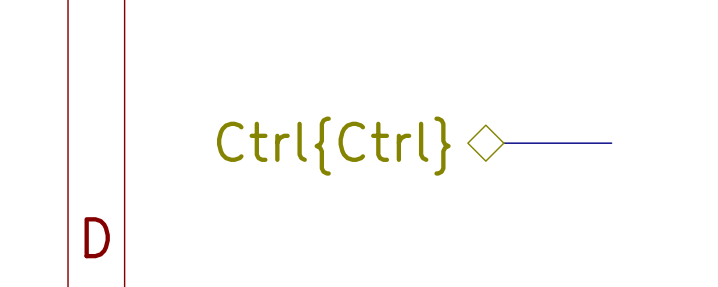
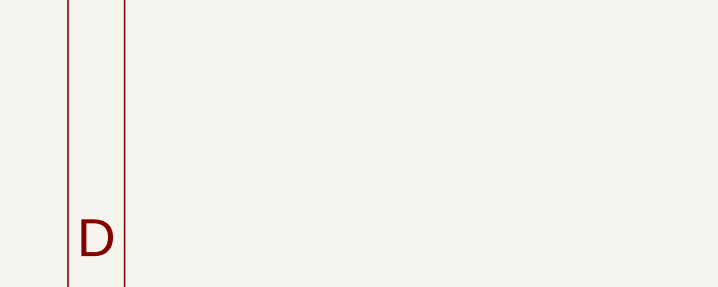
bus: (503, 143) (611, 143) -> none
hierarchical label: Ctrl{Ctrl} (333, 146) -> none

